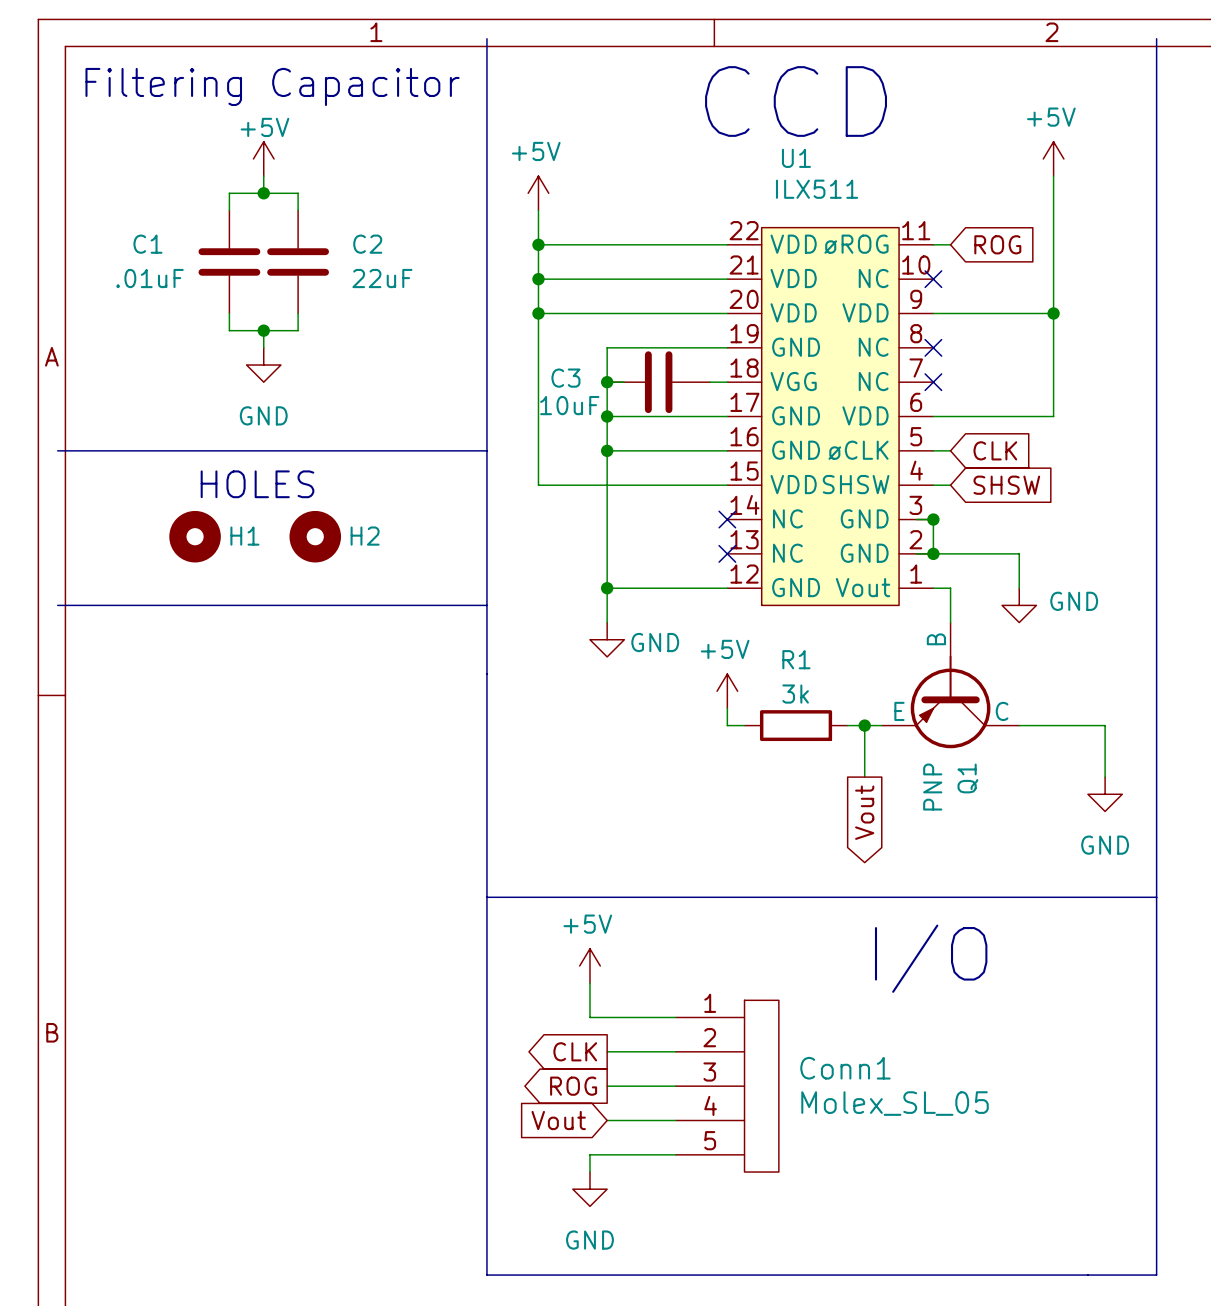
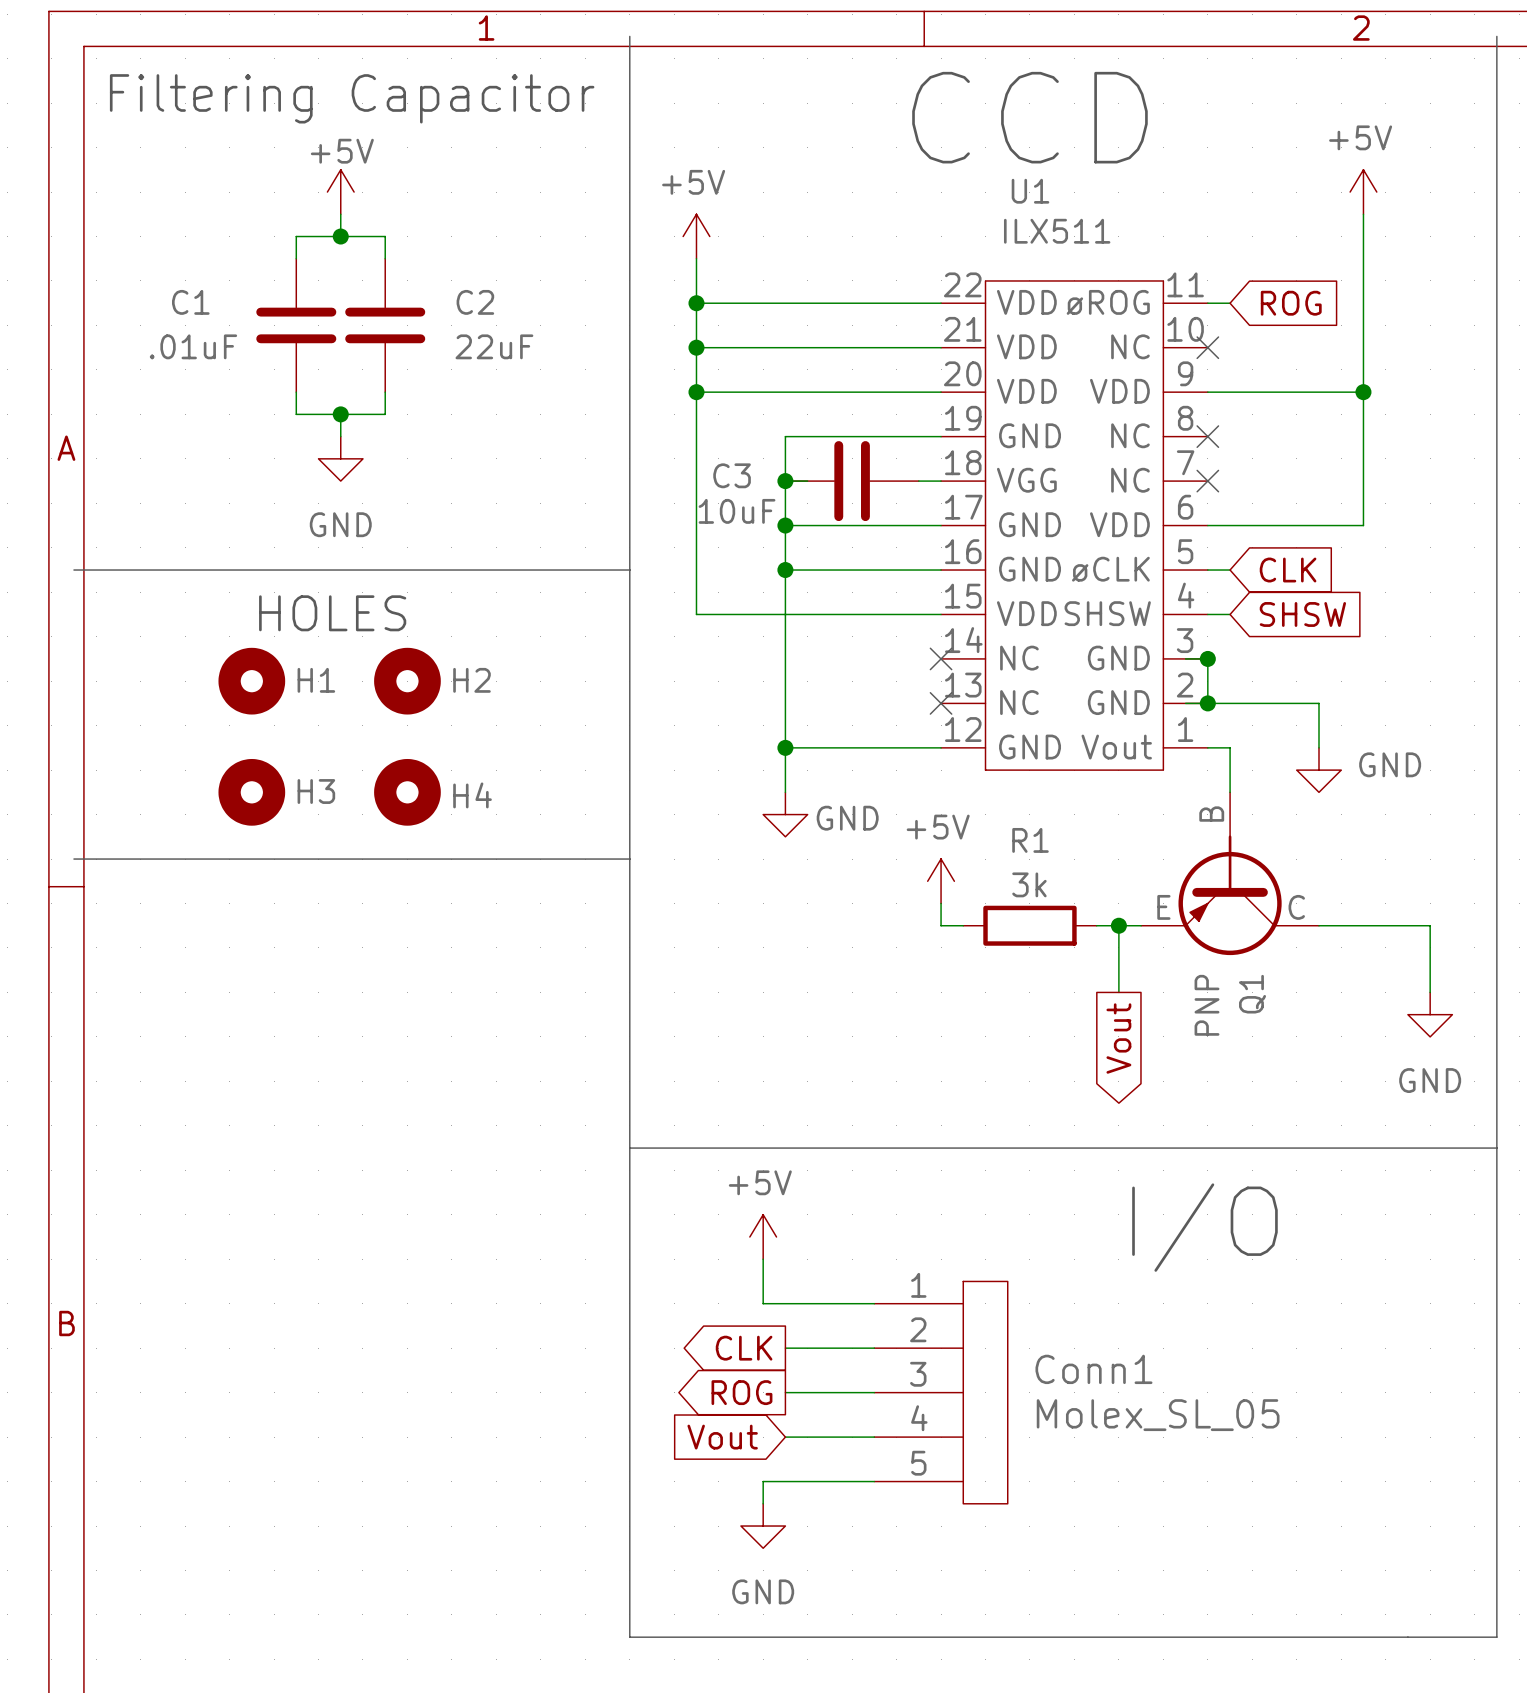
line: (57, 605) (486, 605) -> (73, 859) (629, 859)
H3: none -> (251, 792)
H4: none -> (407, 792)

